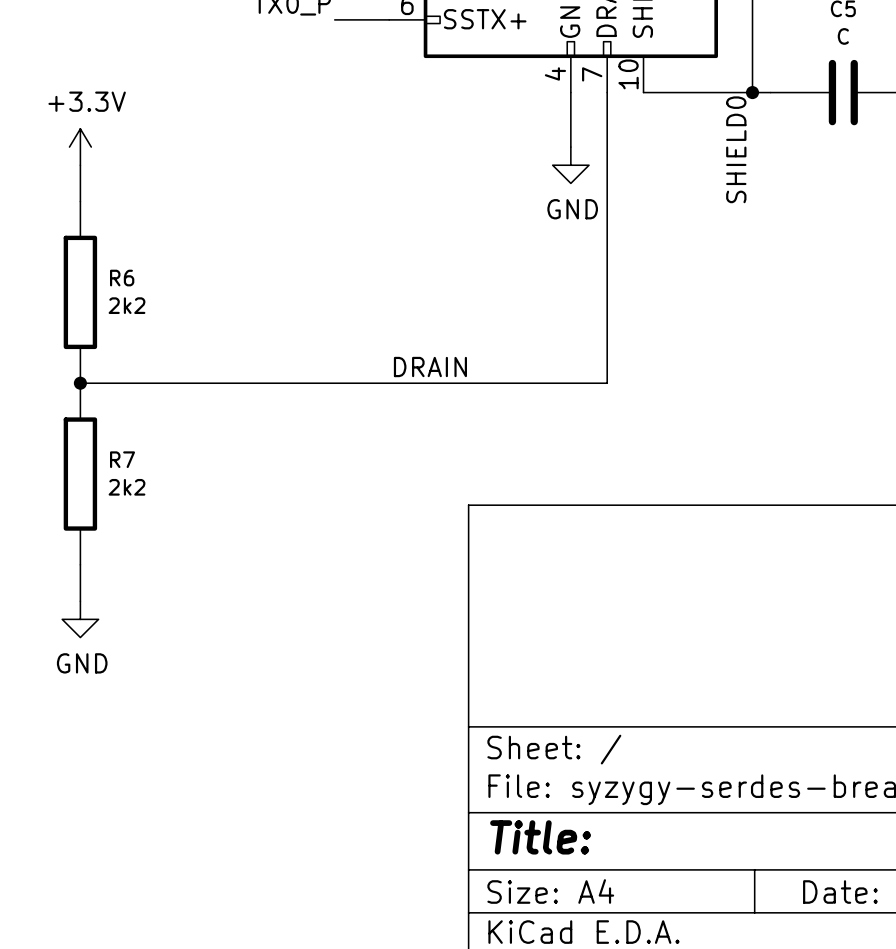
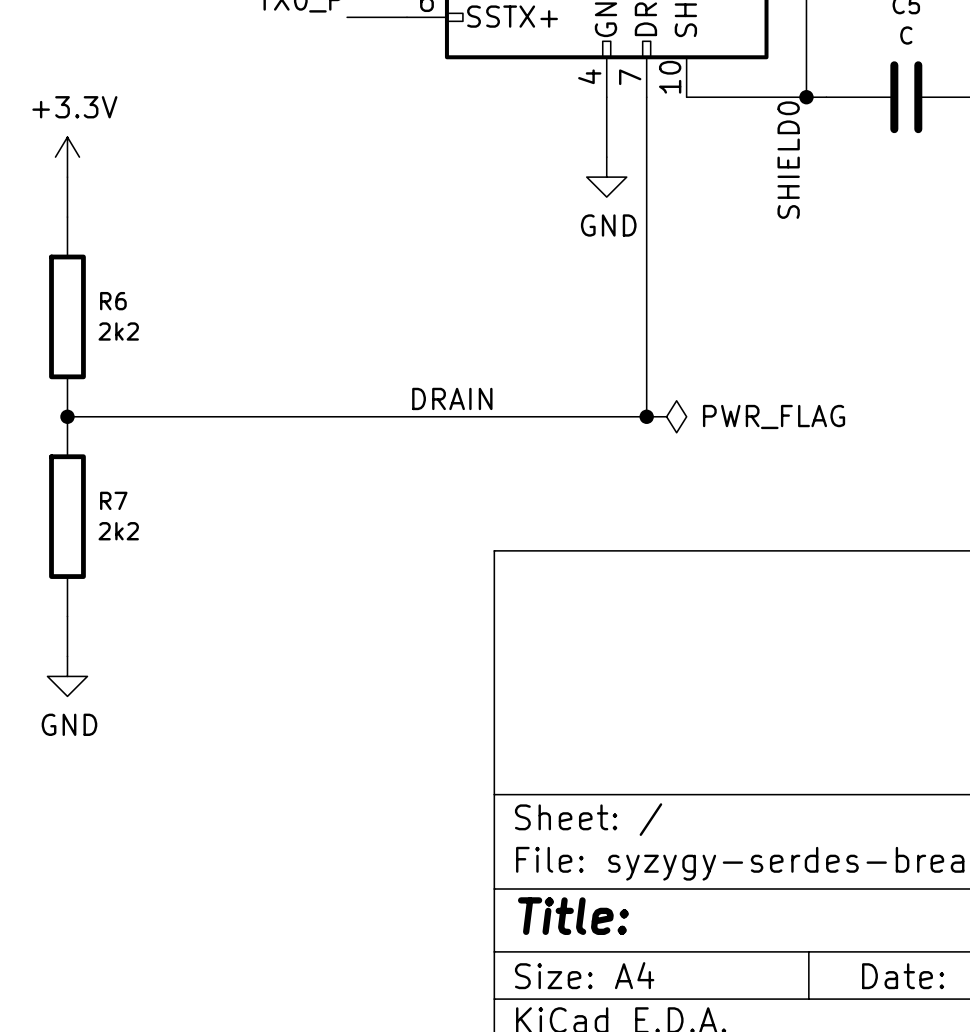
junction: none -> (646, 416)
power symbol: none -> PWR_FLAG (666, 416)

